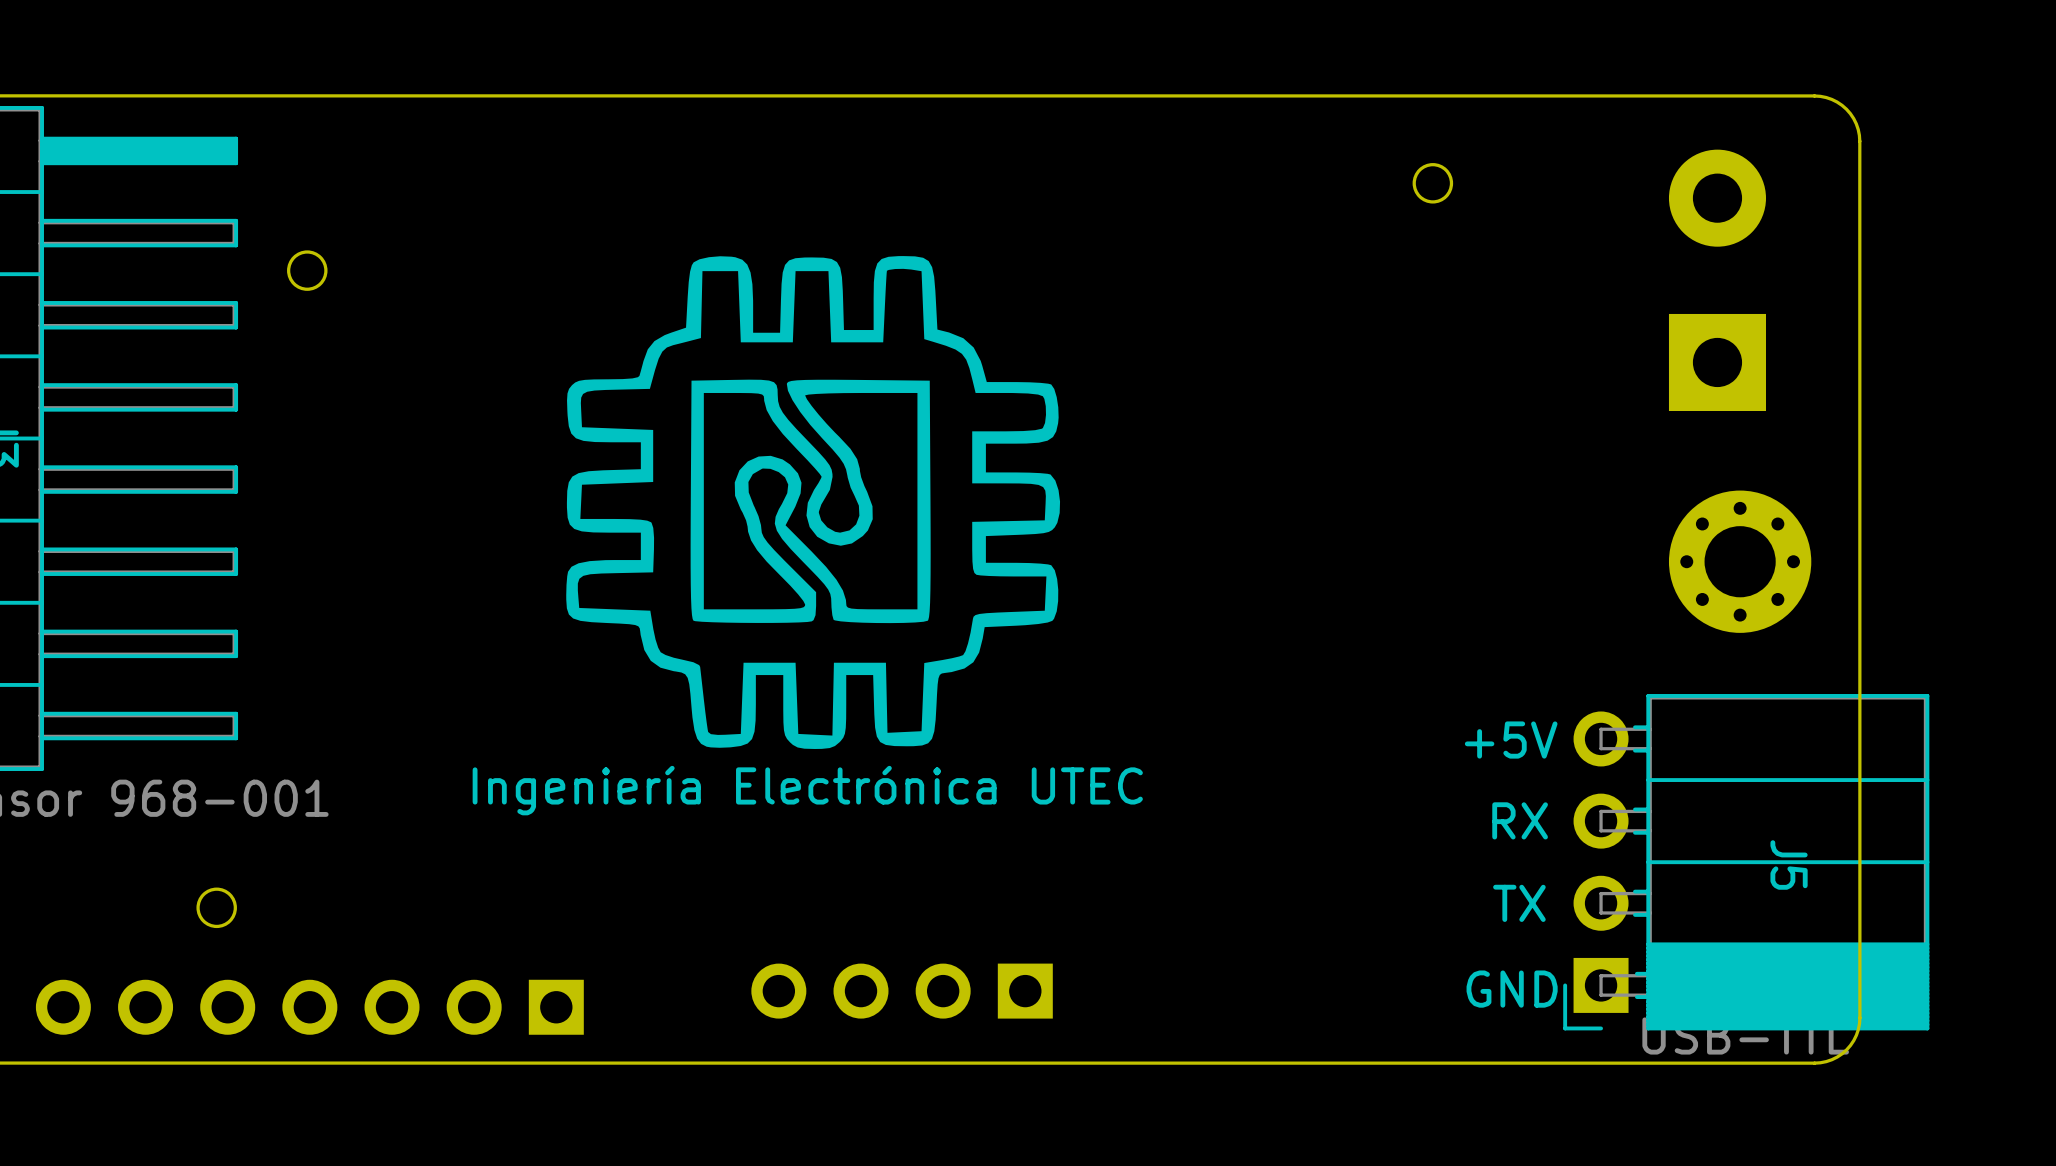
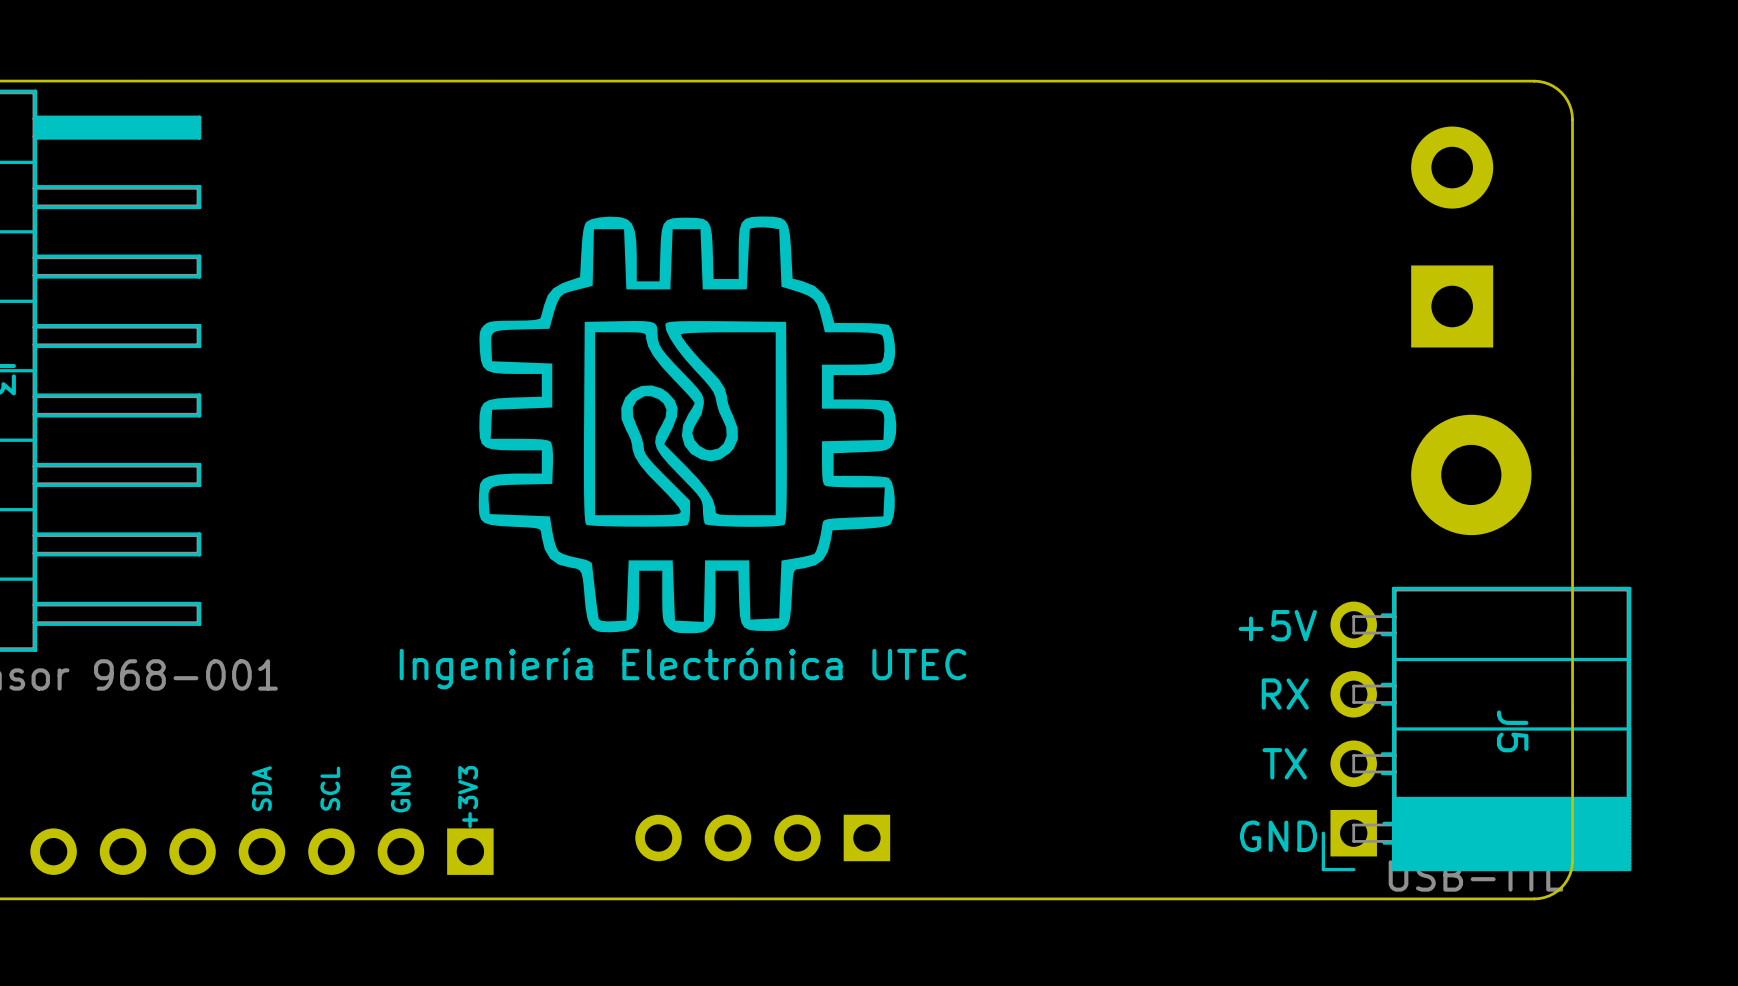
round board edge: [1412, 163, 1454, 204] -> none
round board edge: [287, 250, 328, 291] -> none
part footprint: [1668, 490, 1812, 633] -> [1411, 414, 1532, 536]
round board edge: [196, 887, 237, 929] -> none
text: none -> SDA (261, 788)
text: none -> SCL (330, 788)
text: none -> GND (400, 788)
text: none -> +3V3 (468, 796)

